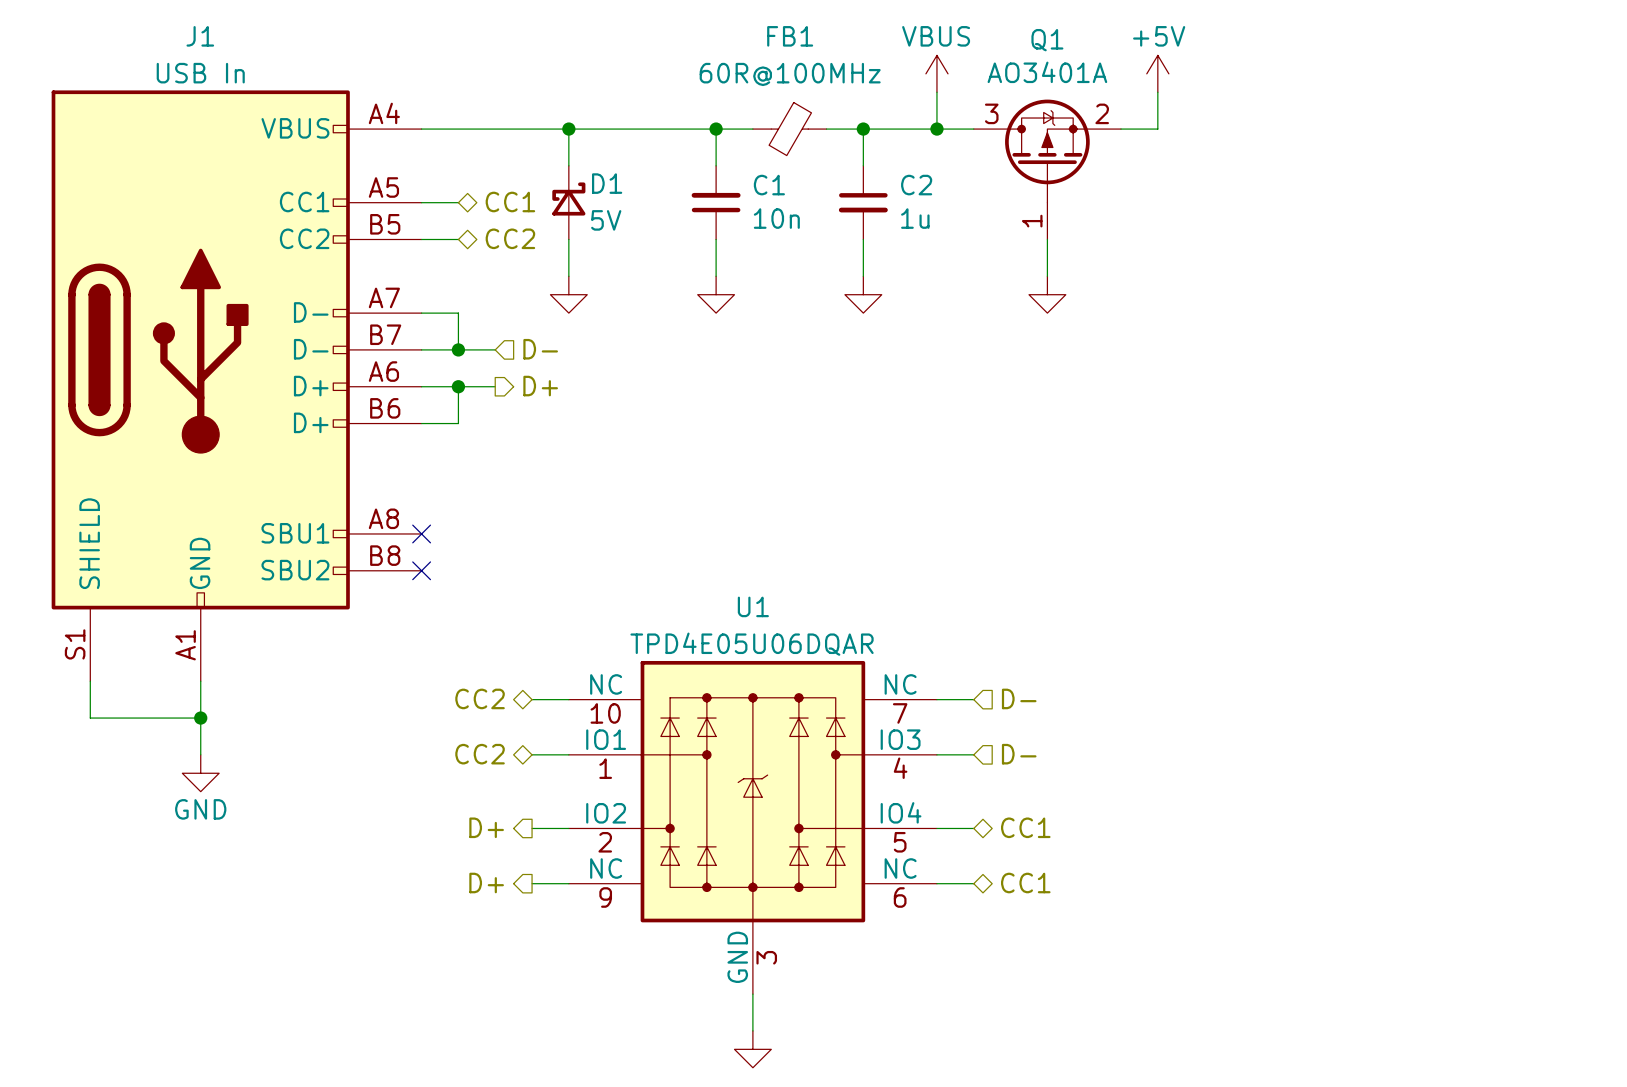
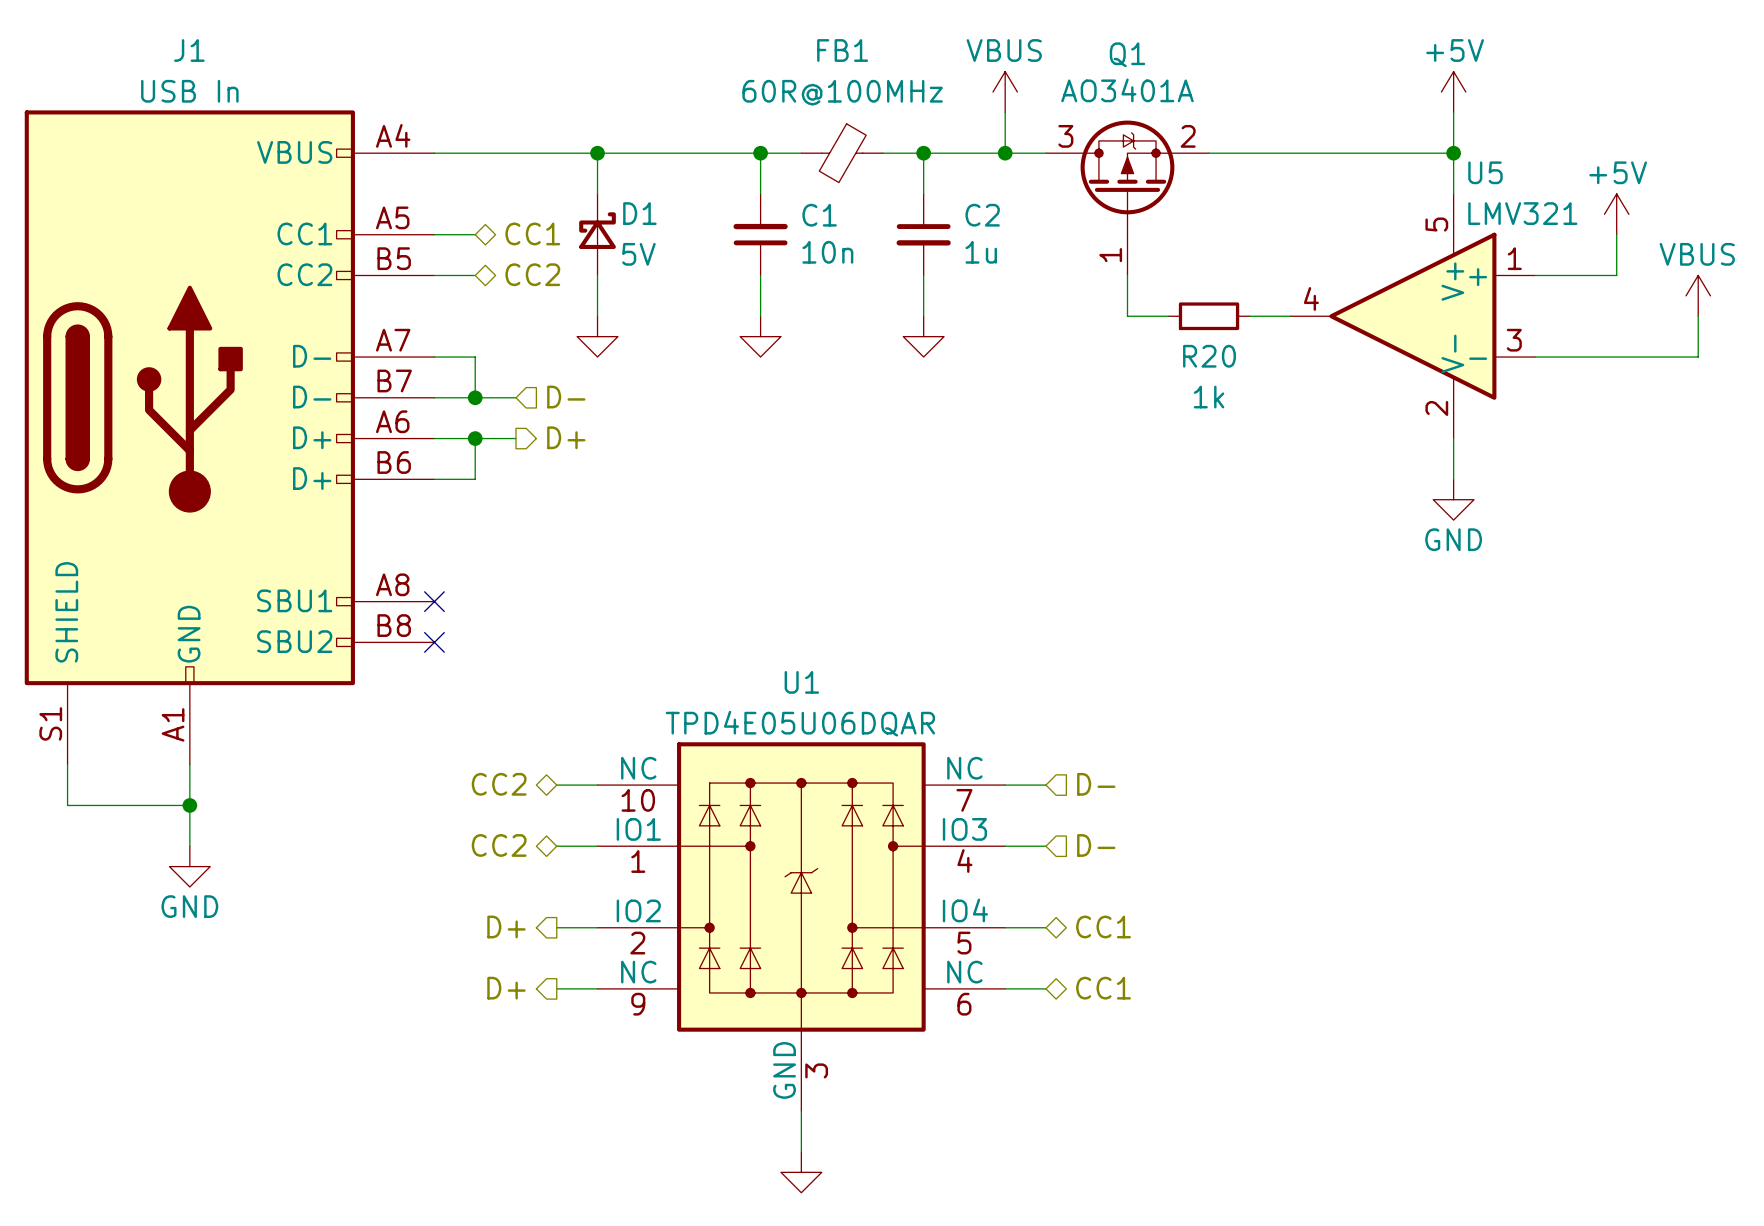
power symbol: +5V (1157, 73) -> none
power symbol: none -> +5V (1453, 92)
wire: (1157, 92) (1157, 129) -> (1453, 153) (1249, 153)
wire: none -> (1453, 112) (1453, 193)
junction: none -> (1453, 153)
power symbol: none -> +5V (1616, 214)
wire: none -> (1616, 234) (1616, 275) (1535, 275)
power symbol: none -> VBUS (1698, 295)
wire: none -> (1127, 316) (1168, 316)
R20: none -> 1k (1209, 316)
wire: none -> (1249, 316) (1290, 316)
U5: none -> LMV321 (1412, 316)
wire: none -> (1698, 316) (1698, 357) (1535, 357)
power symbol: (1047, 294) -> none
wire: none -> (1453, 438) (1453, 479)
power symbol: none -> GND (1453, 499)

